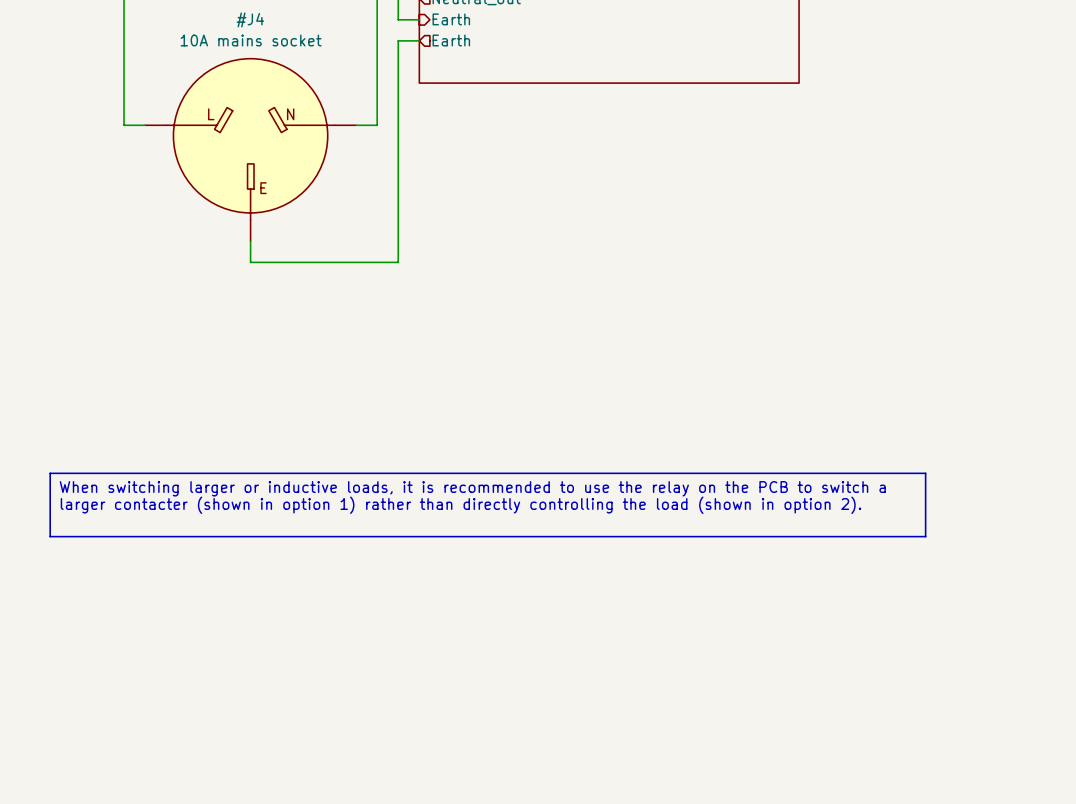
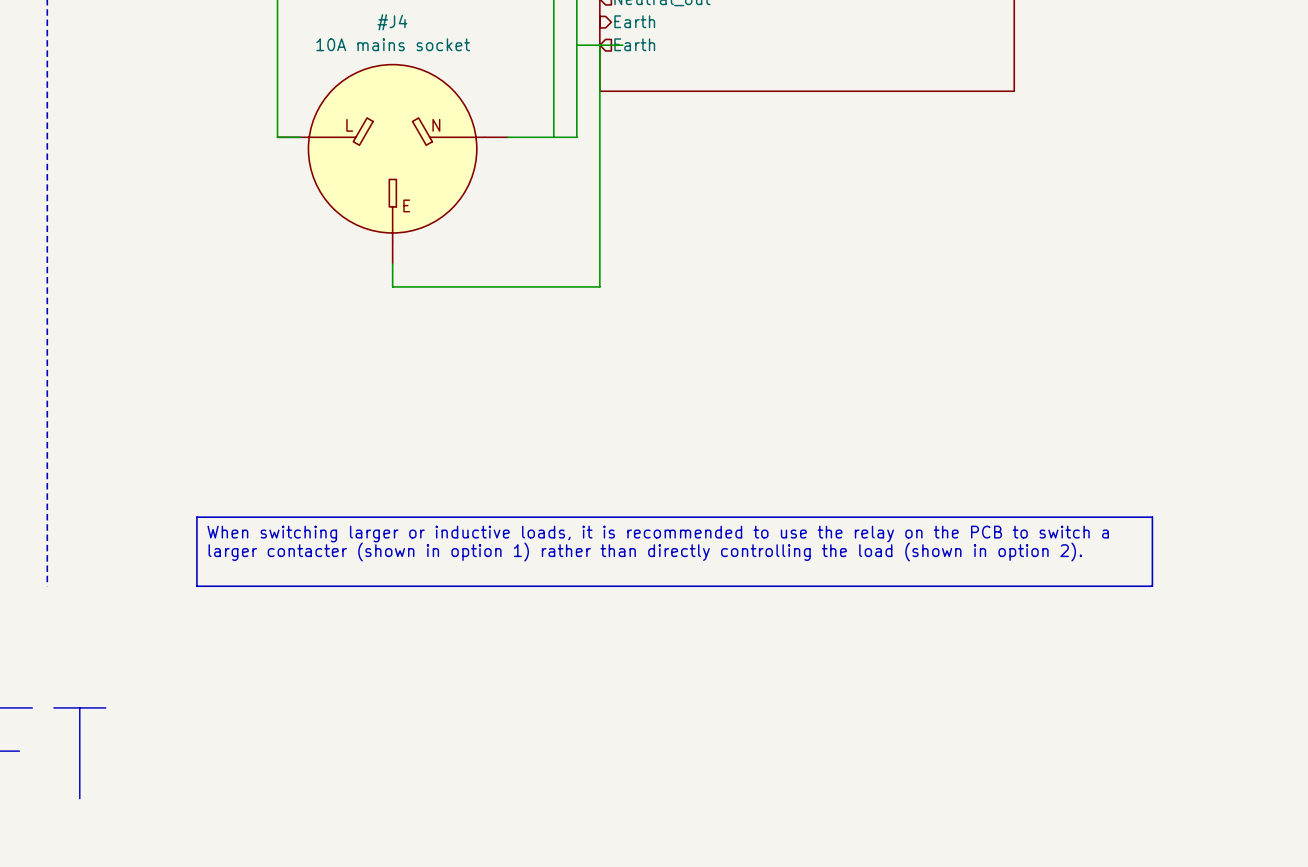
wire: (398, 19) (419, 19) -> (576, 22) (576, 45)
wire: none -> (553, 137) (576, 137)
wire: (398, 125) (398, 262) -> (622, 45) (599, 45) (599, 286) (576, 286)
drawing position: (250, 139) -> (392, 152)
wire: (250, 241) (250, 262) -> (392, 263) (392, 286) (415, 286)

